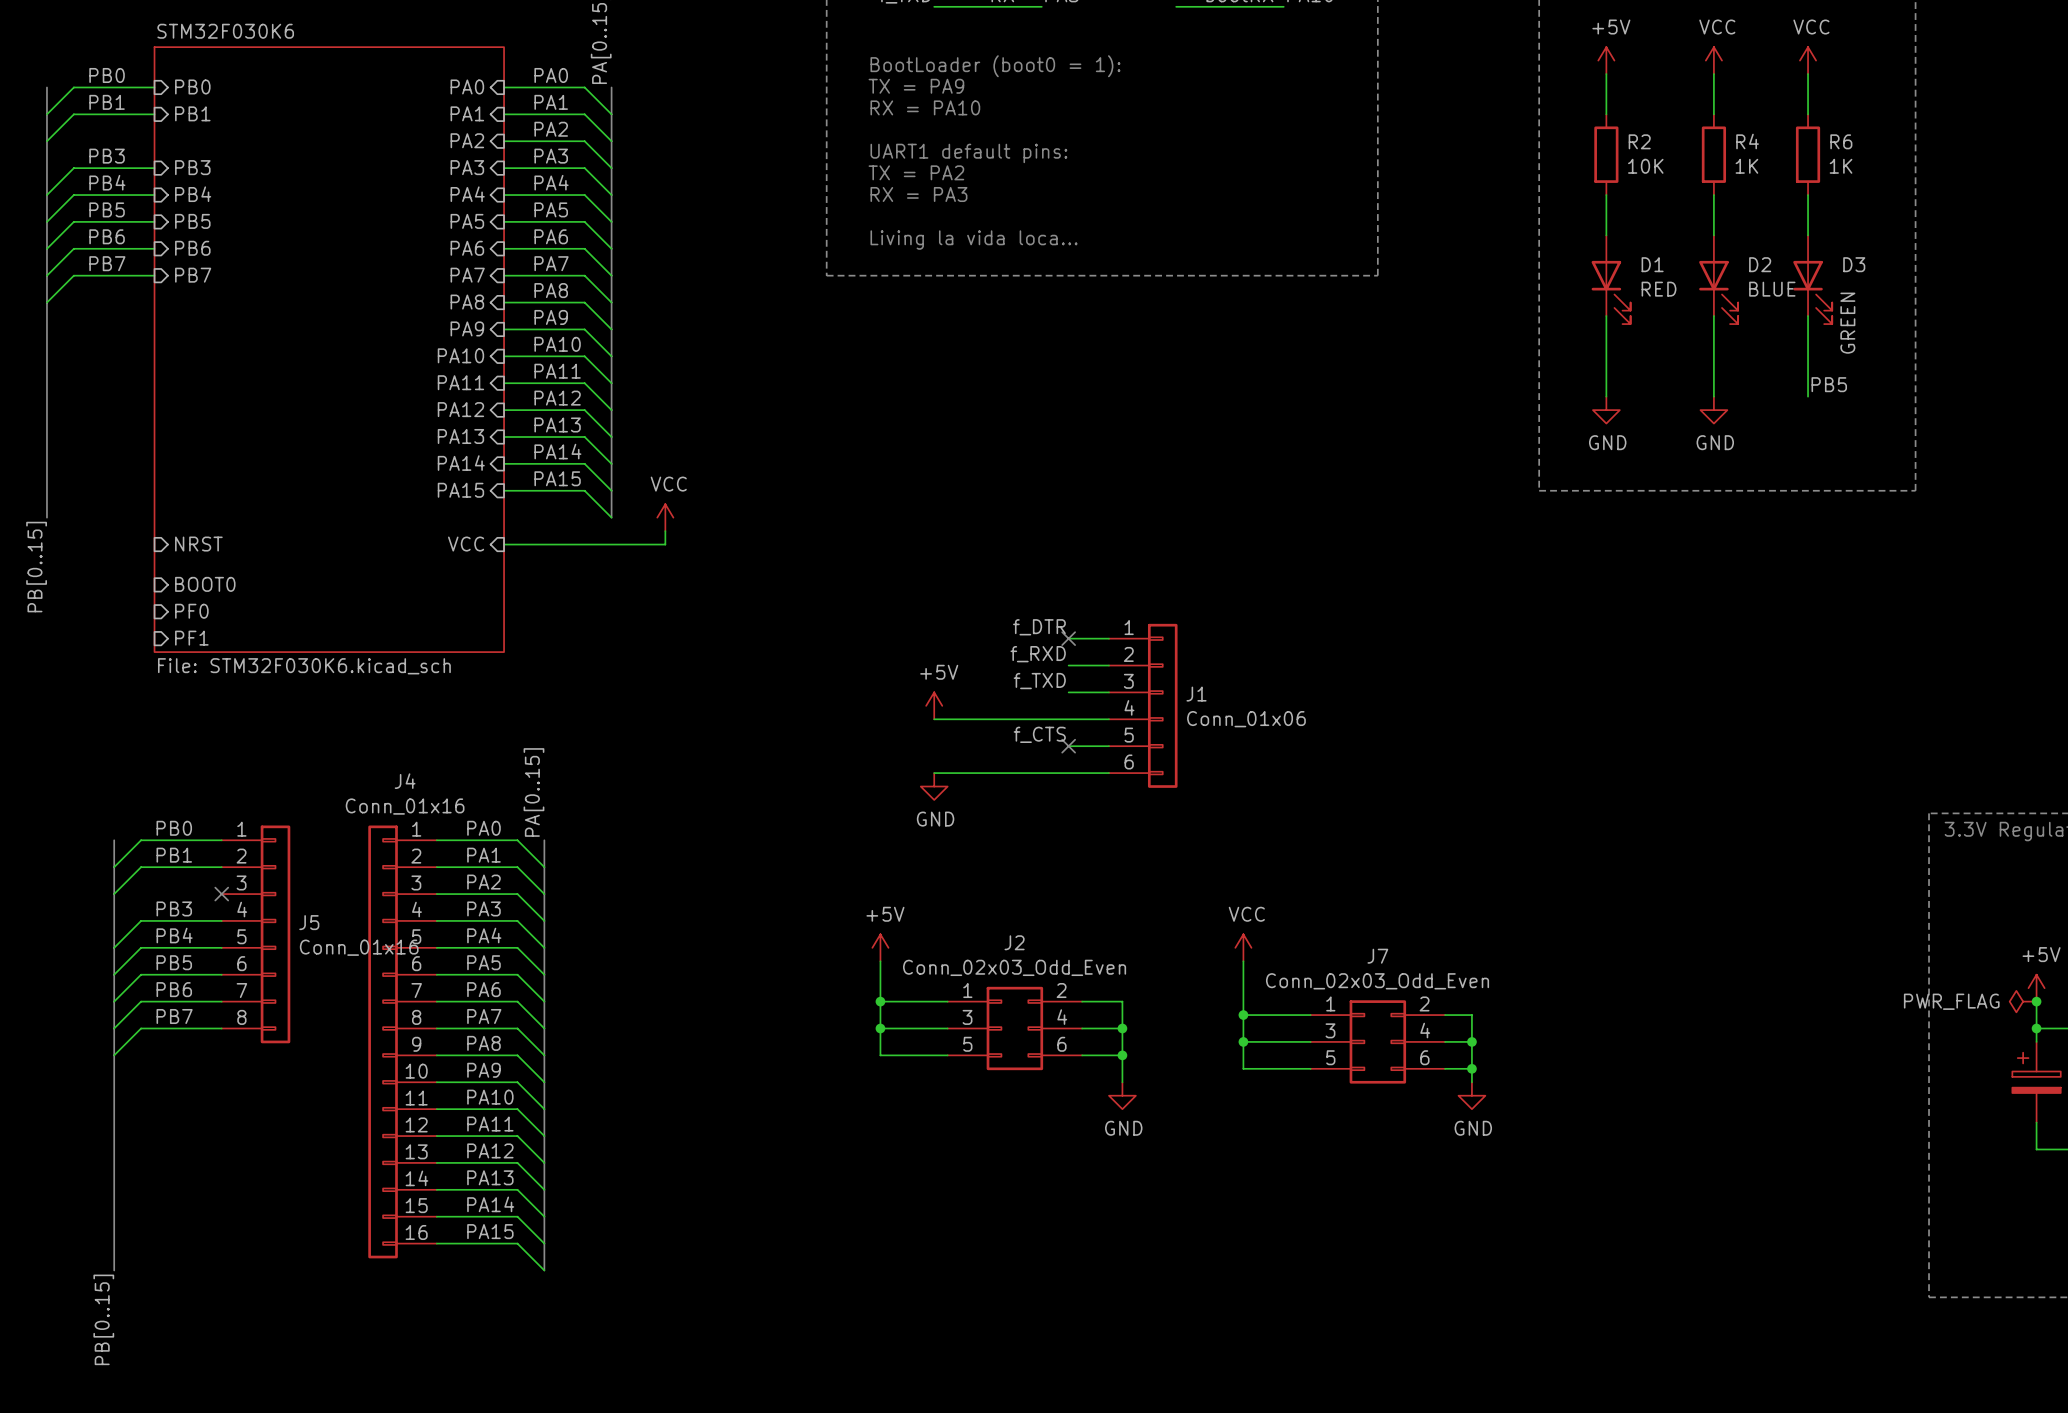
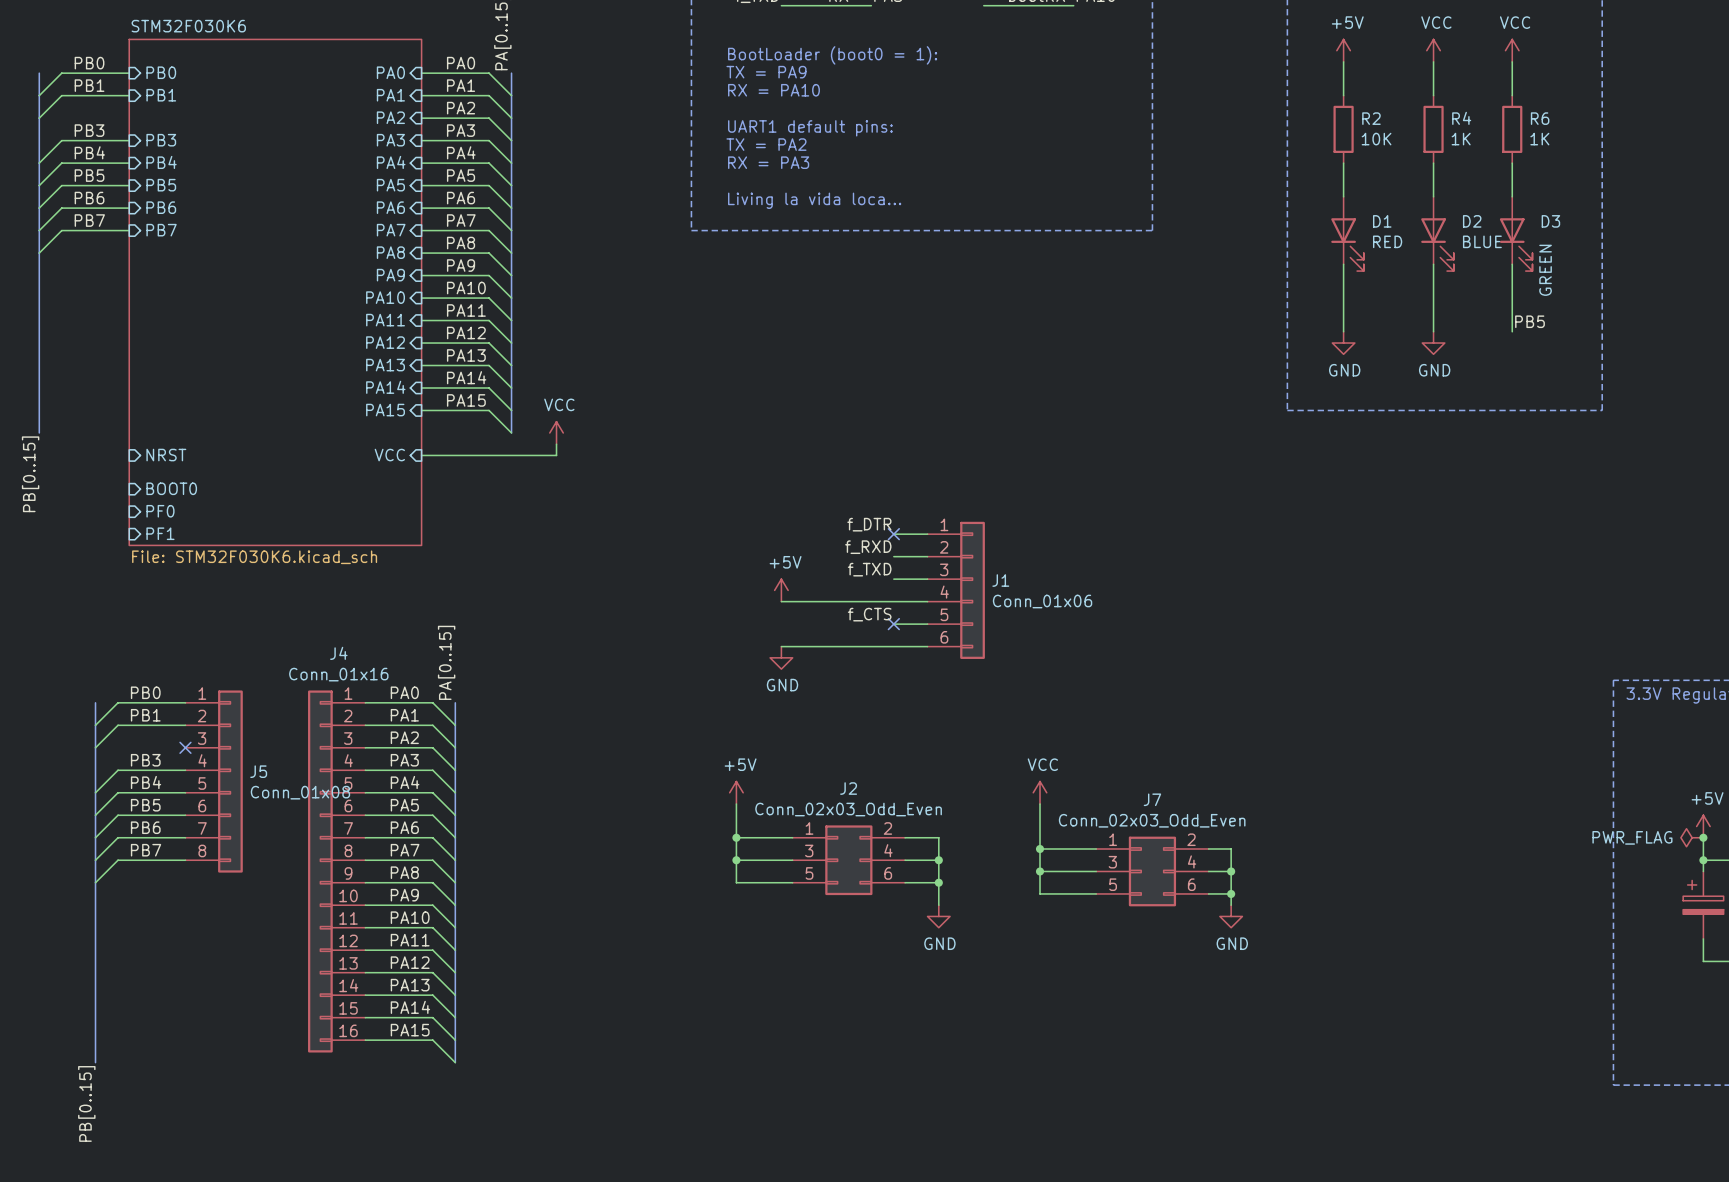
J5 value: Conn_01x16 (359, 947) -> Conn_01x08 (300, 792)

